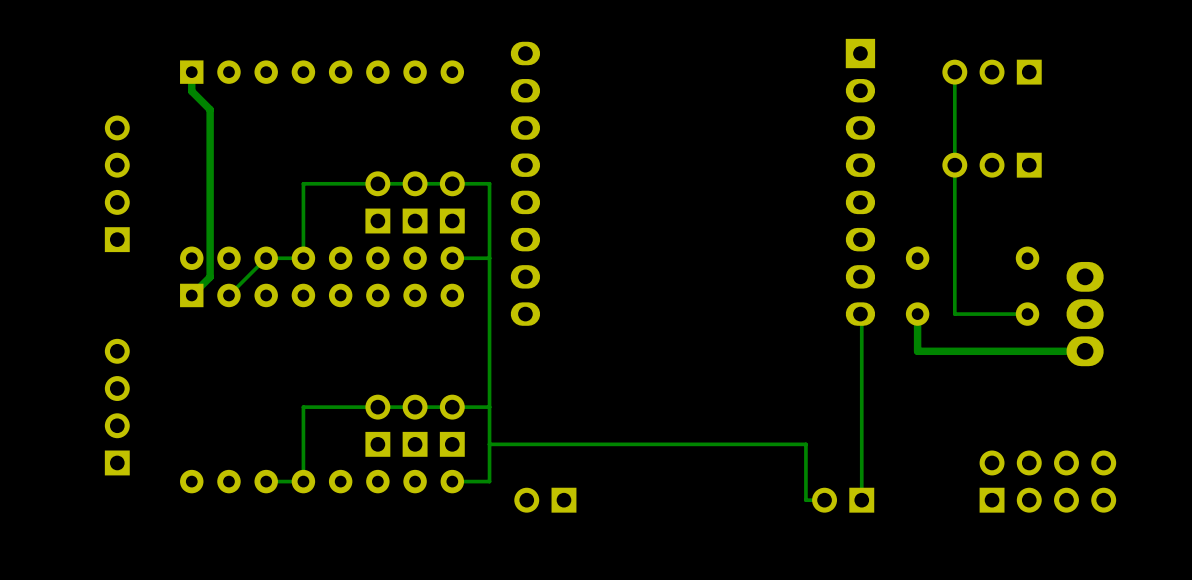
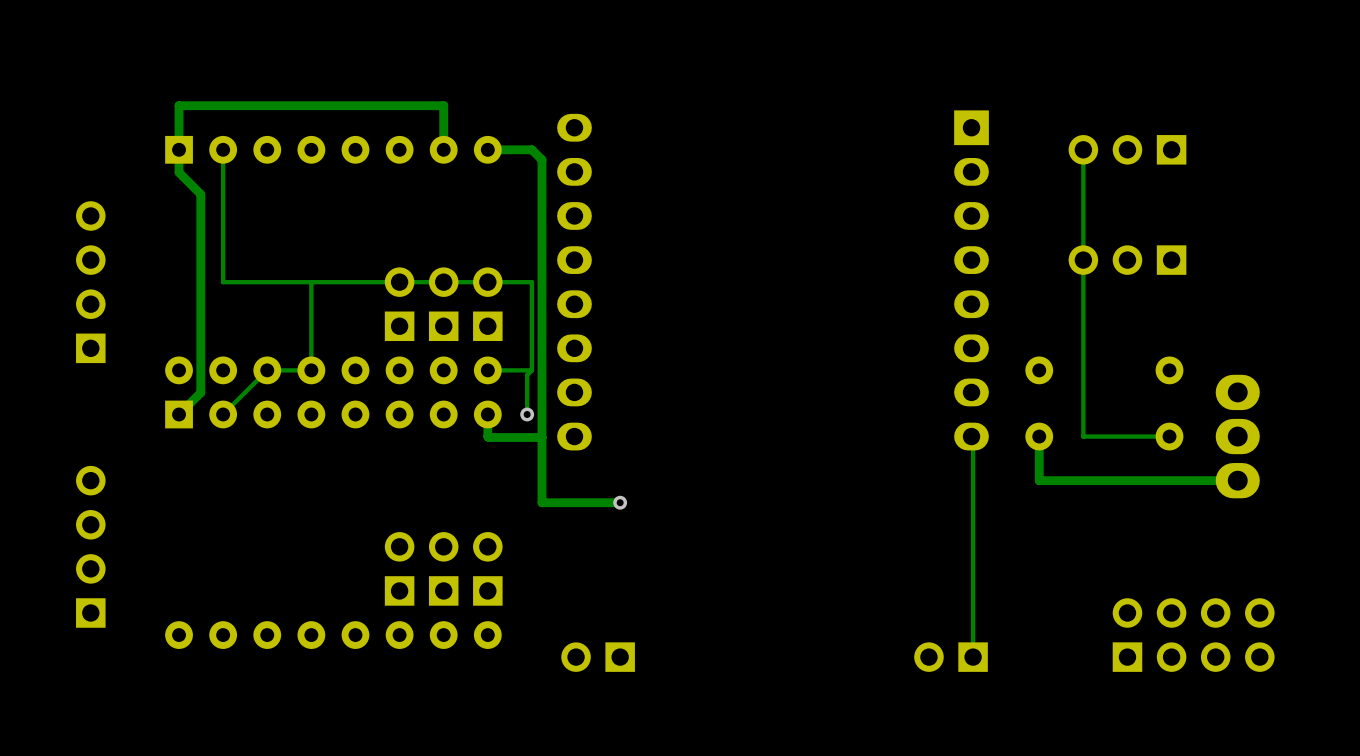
track: none -> (223, 149) (223, 282) (311, 282)
track: none -> (443, 149) (443, 105) (179, 105) (179, 149)
track: none -> (487, 149) (531, 149) (541, 159) (541, 502) (620, 502)
track: (489, 258) (489, 481) (452, 481) -> (531, 370) (527, 375) (527, 414)
track: none -> (487, 414) (488, 437) (541, 437)
via: none -> (527, 414)
via: none -> (620, 502)
track: (489, 407) (303, 407) (303, 481) (266, 481) -> none
track: (489, 444) (805, 444) (805, 500) (824, 500) -> none

